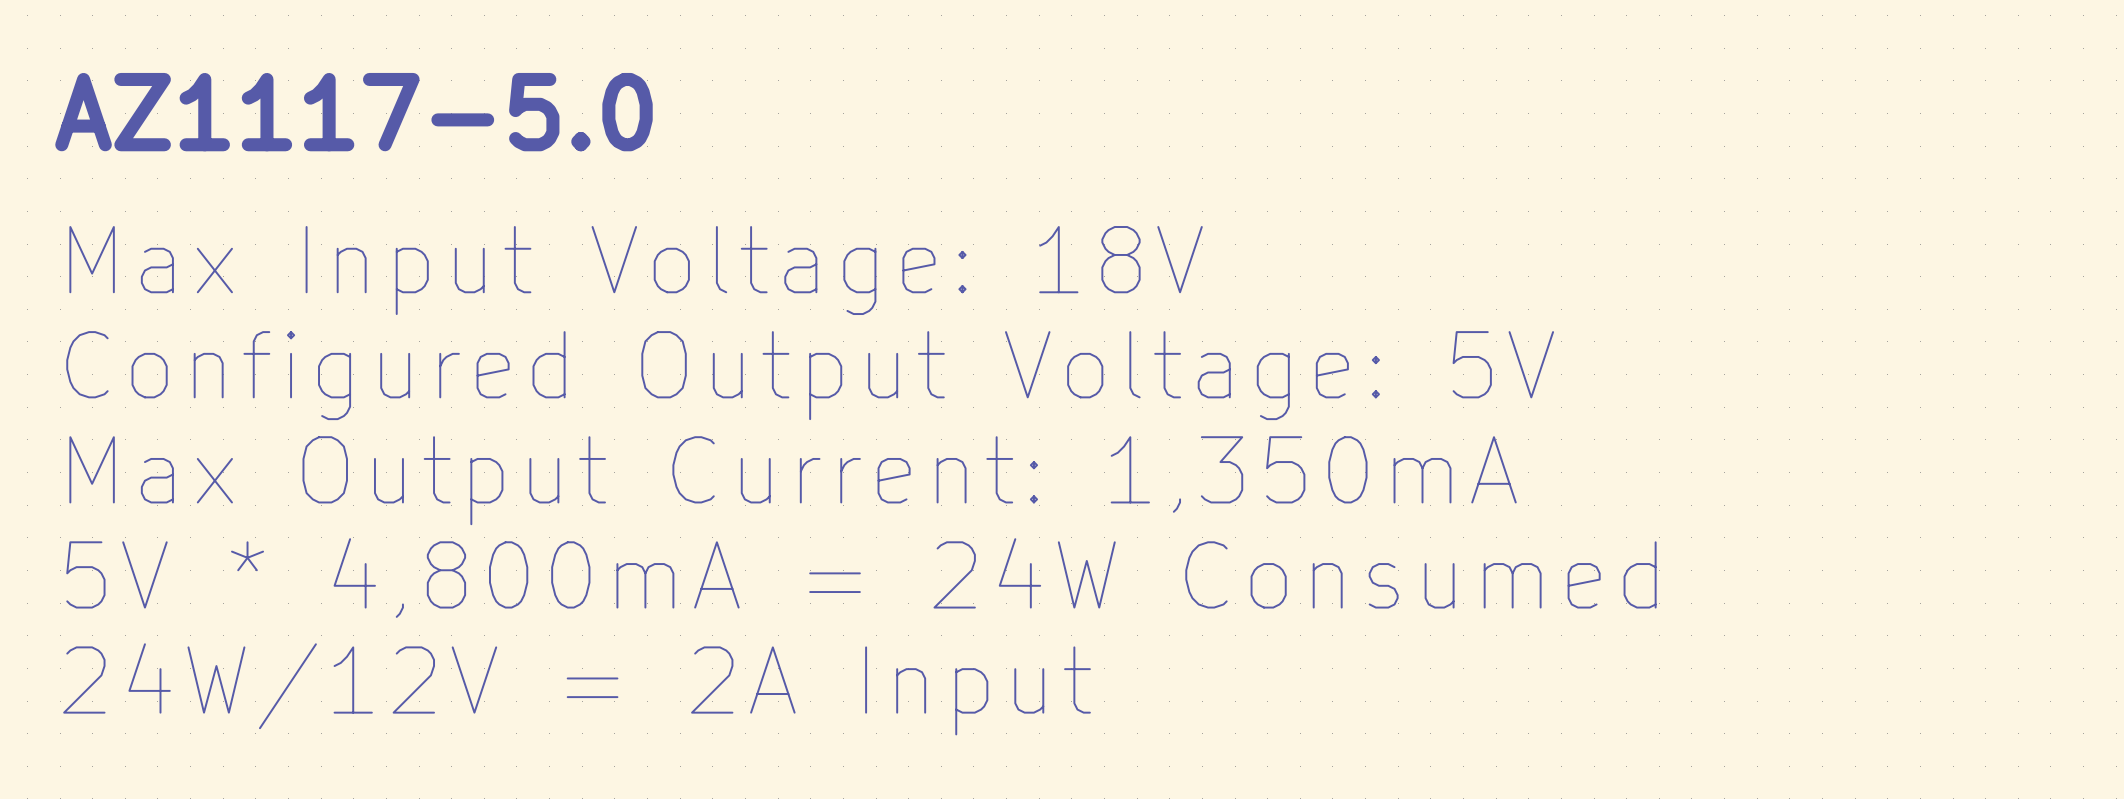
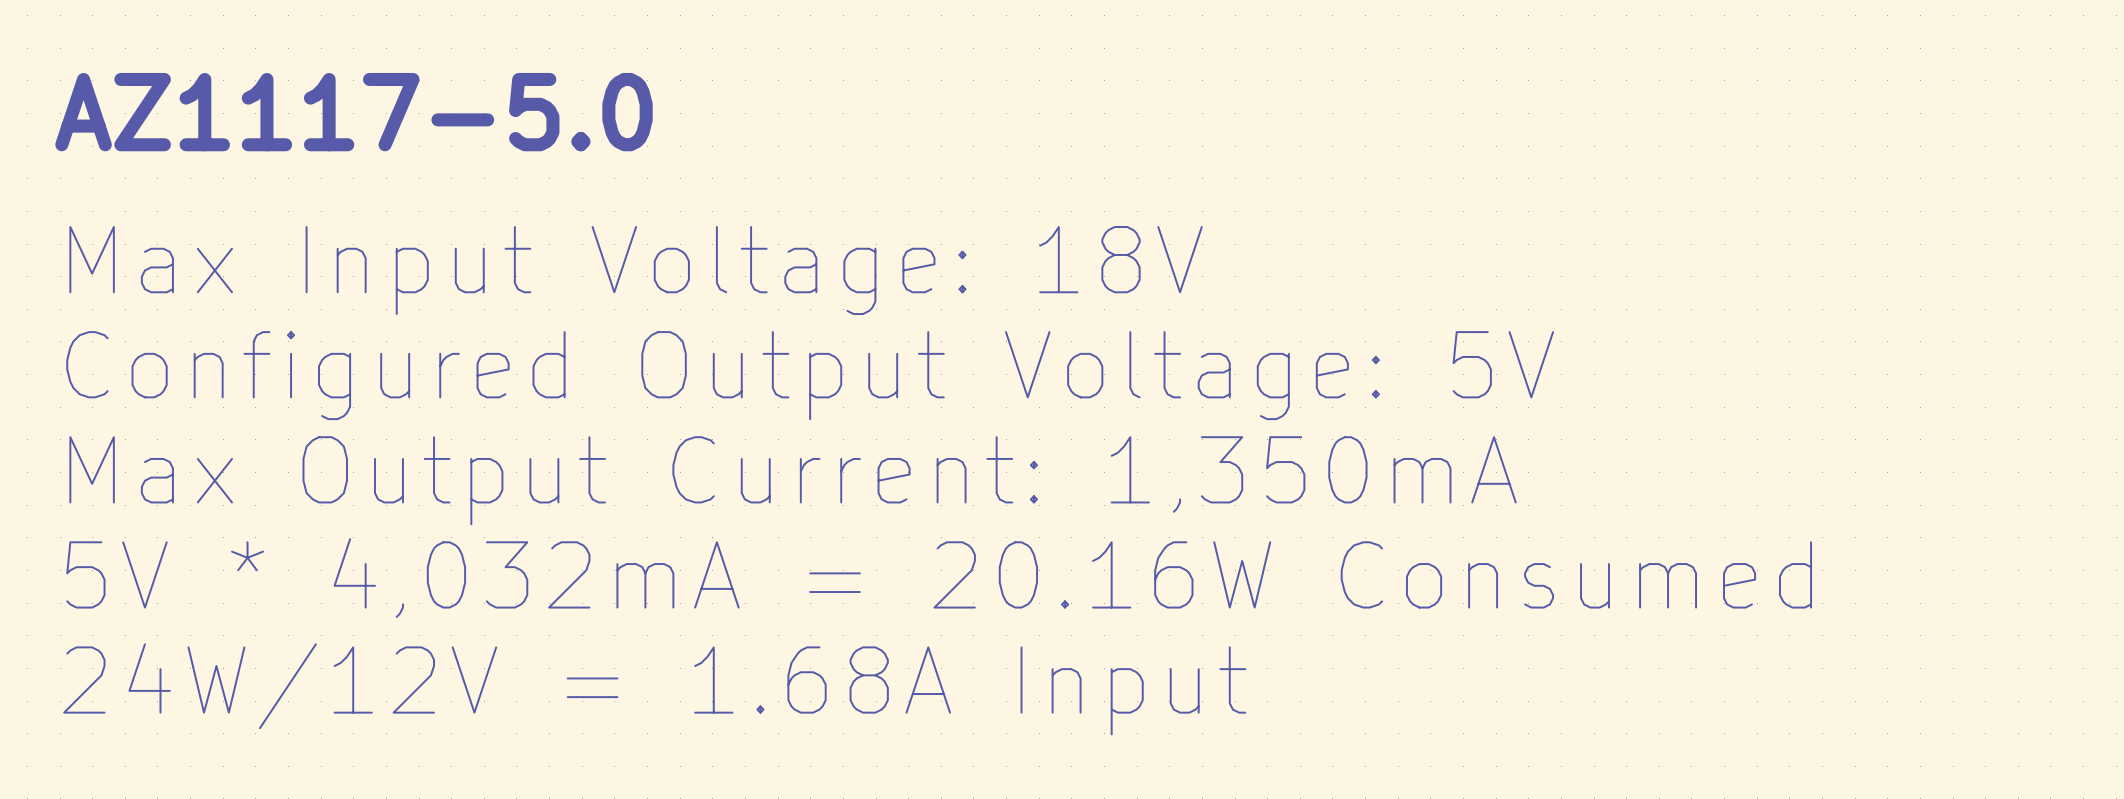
text: 5V * 4,800mA = 24W Consumed (861, 578) -> 5V * 4,032mA = 20.16W Consumed (939, 578)
text: 24W/12V = 2A Input (577, 689) -> 24W/12V = 1.68A Input (654, 689)

